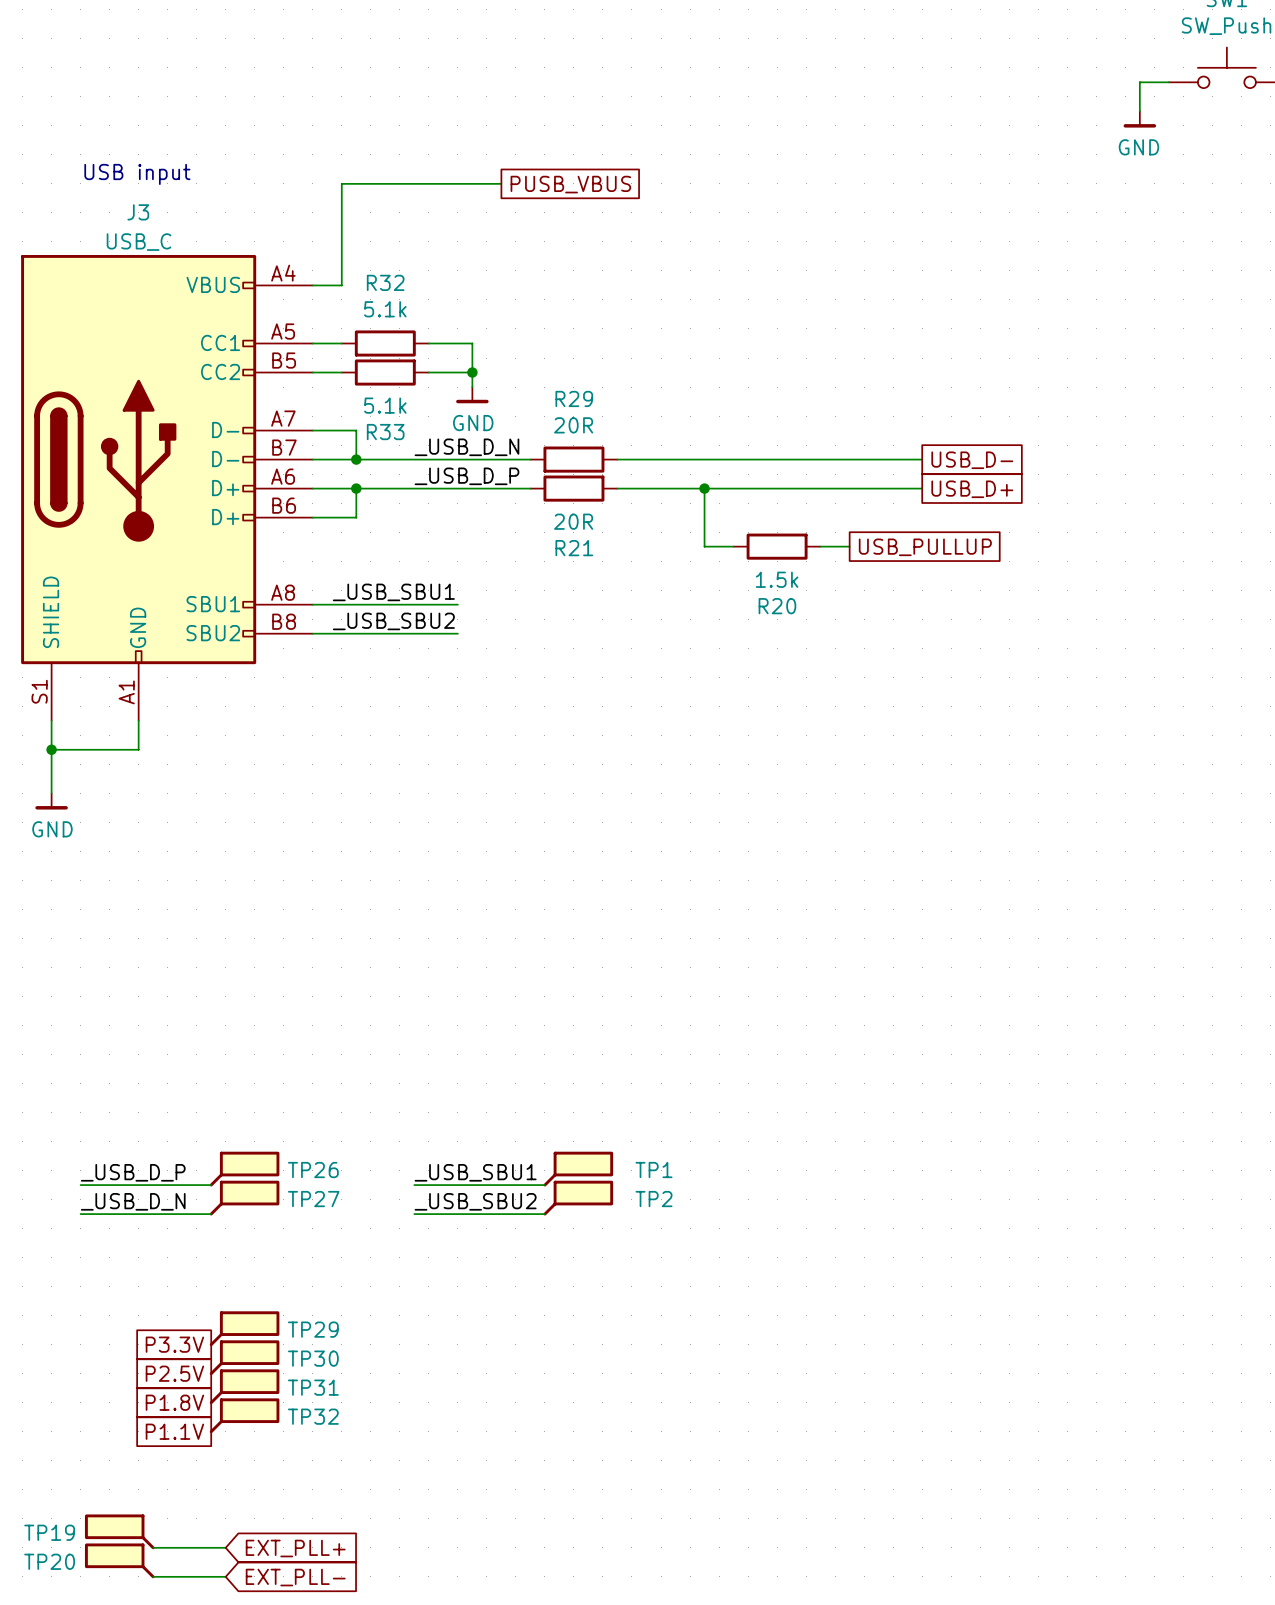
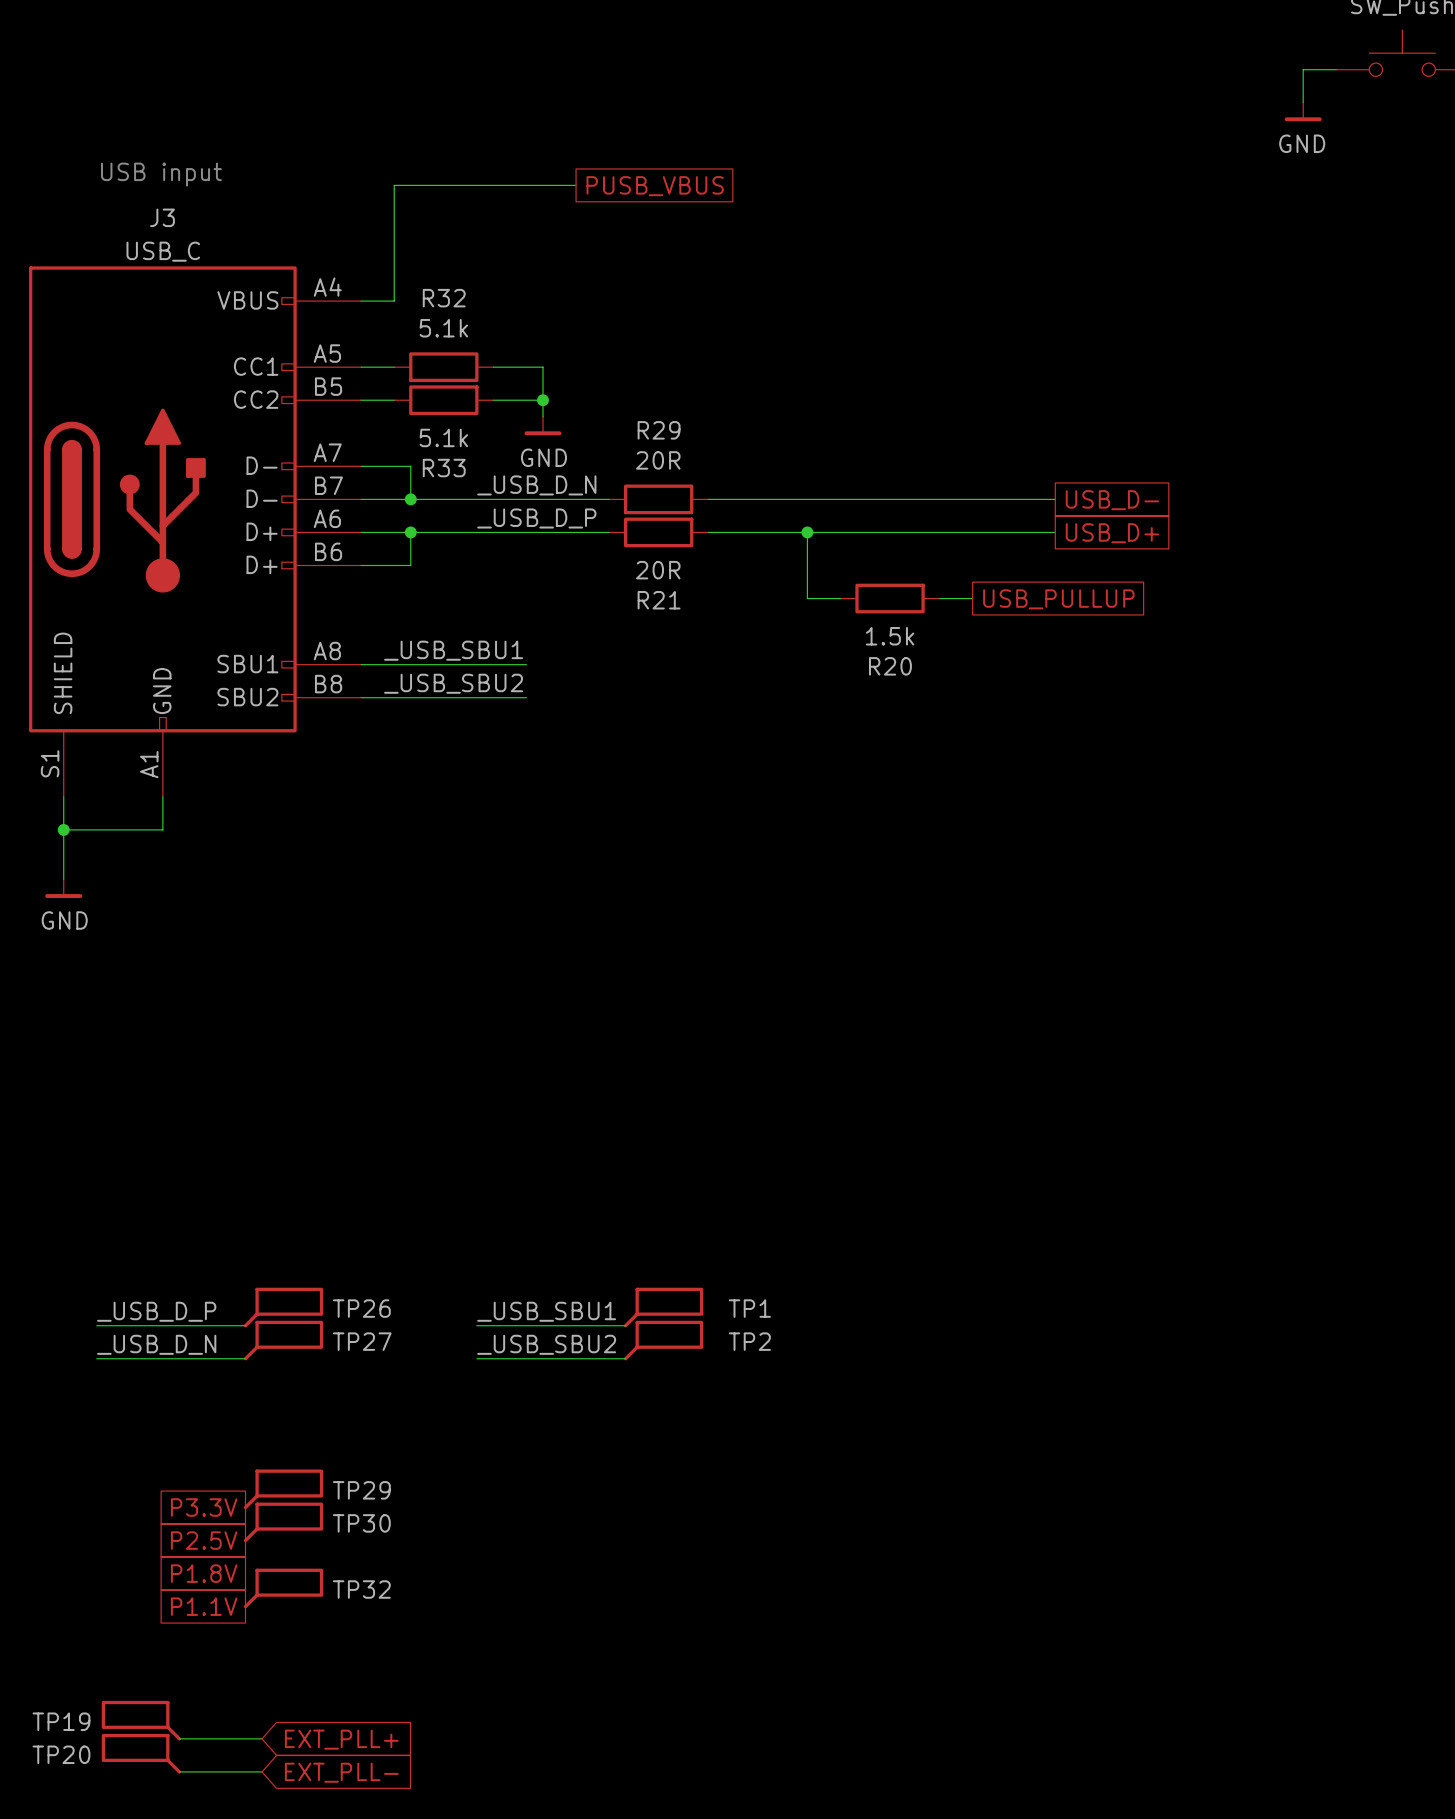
TP31: (244, 1386) -> none

